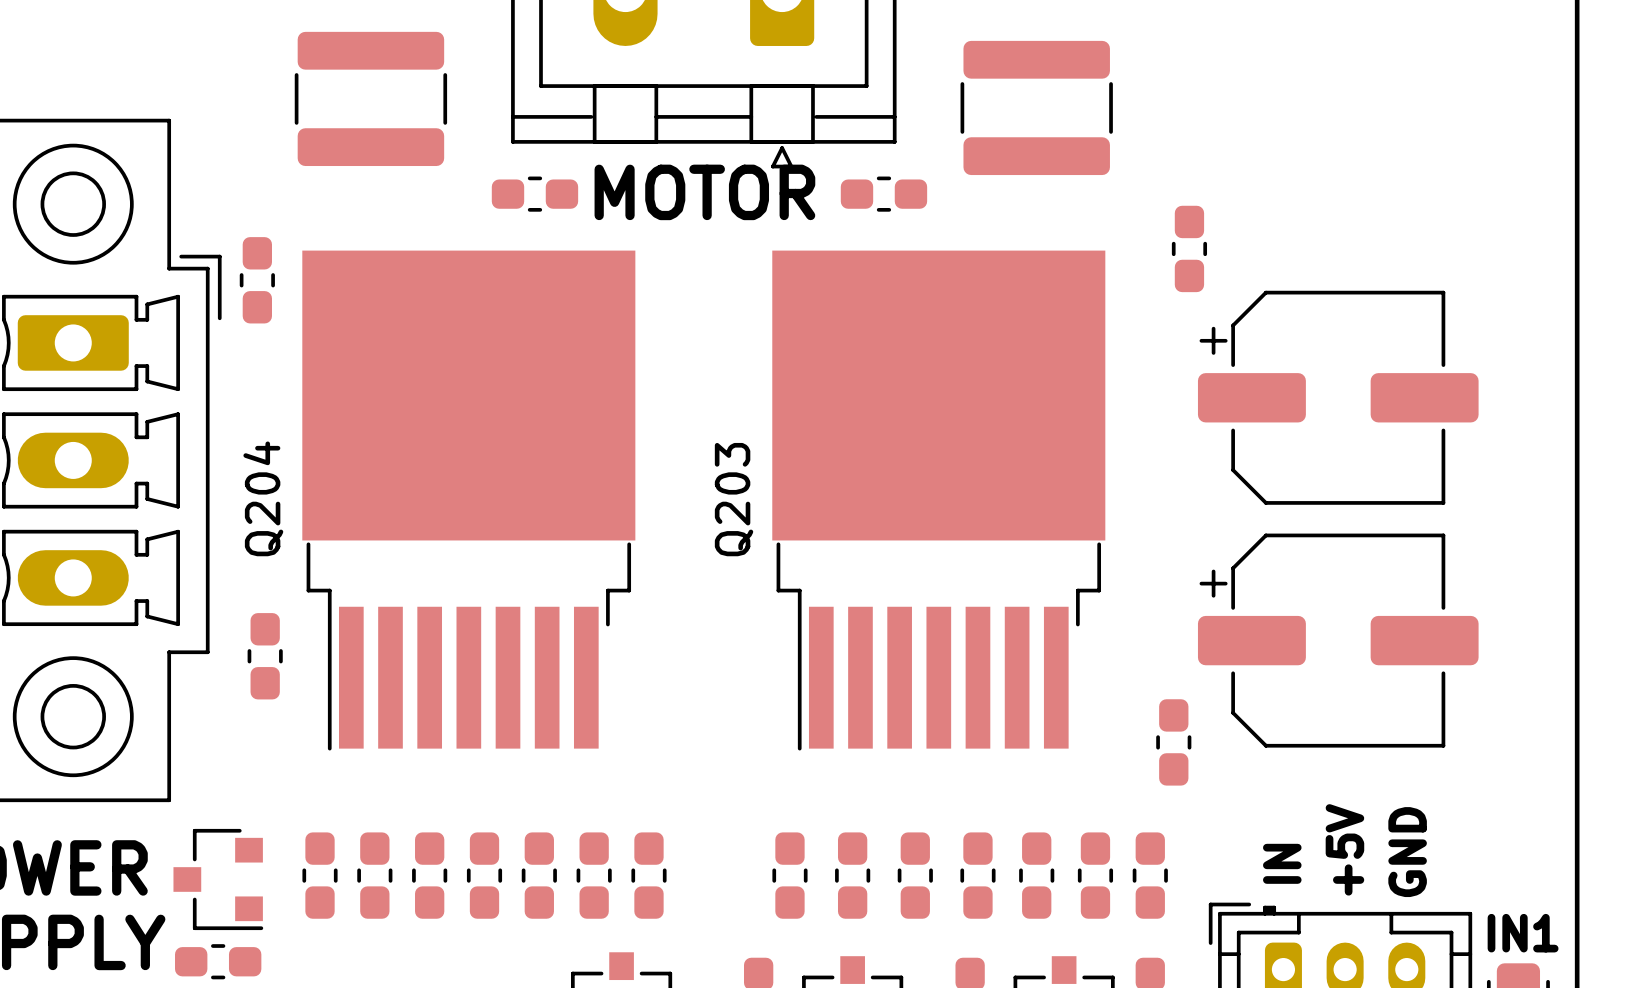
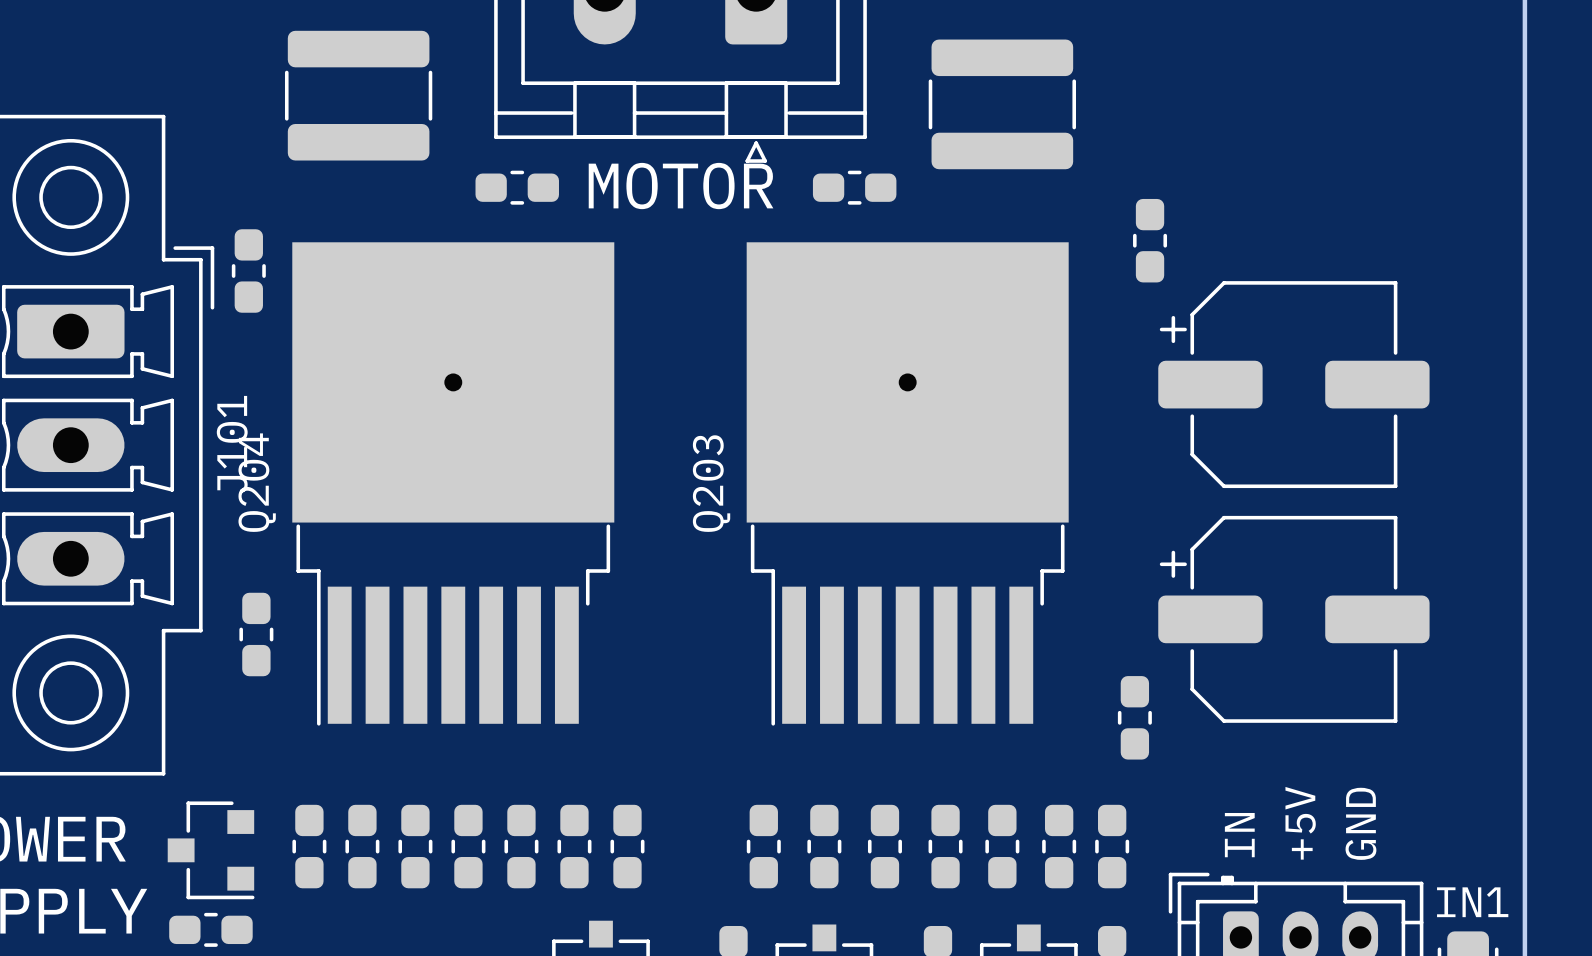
Q204 footprint: [302, 250, 636, 751] -> [292, 242, 615, 726]
Q203 footprint: [772, 250, 1106, 751] -> [746, 242, 1069, 726]
J101 name: none -> J101 (232, 444)

